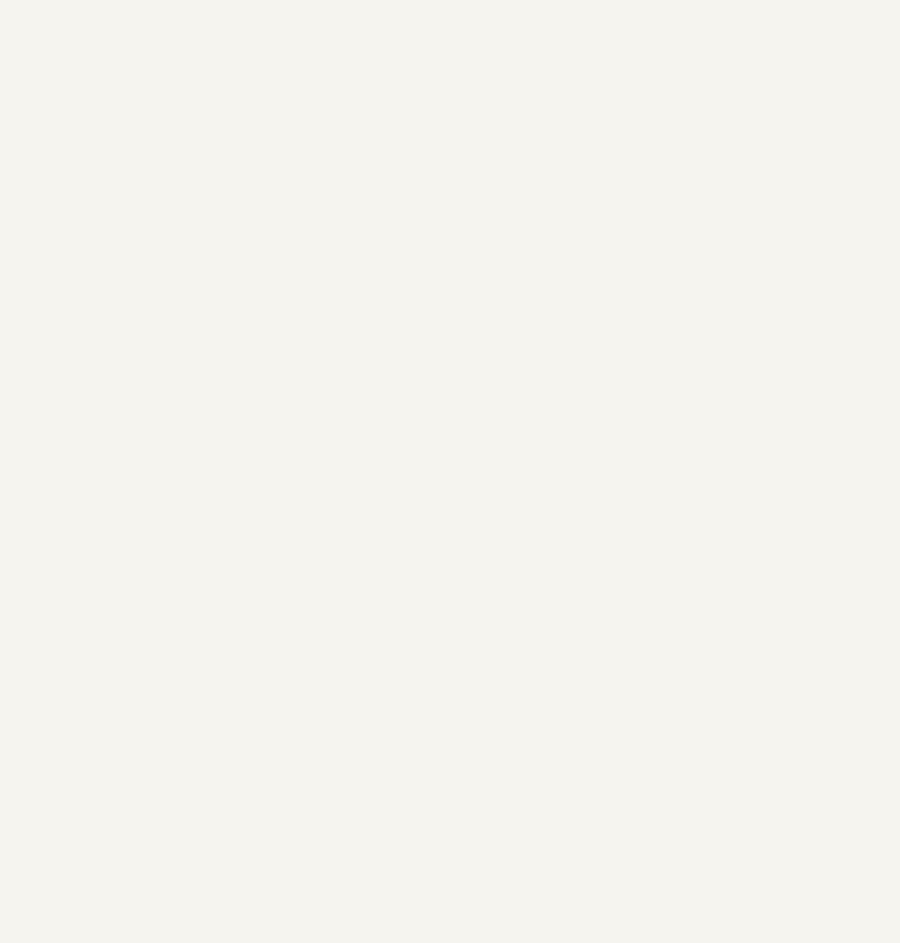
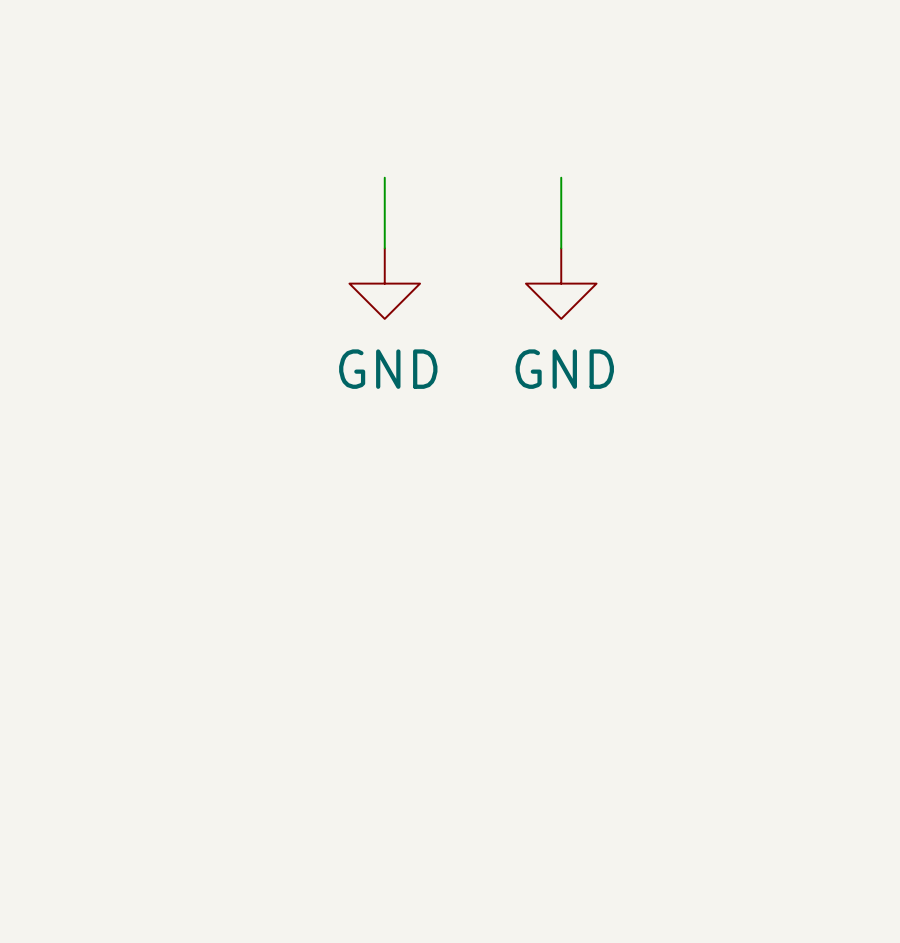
wire: none -> (384, 177) (384, 248)
wire: none -> (561, 177) (561, 248)
power symbol: none -> GND (384, 283)
power symbol: none -> GND (561, 283)

